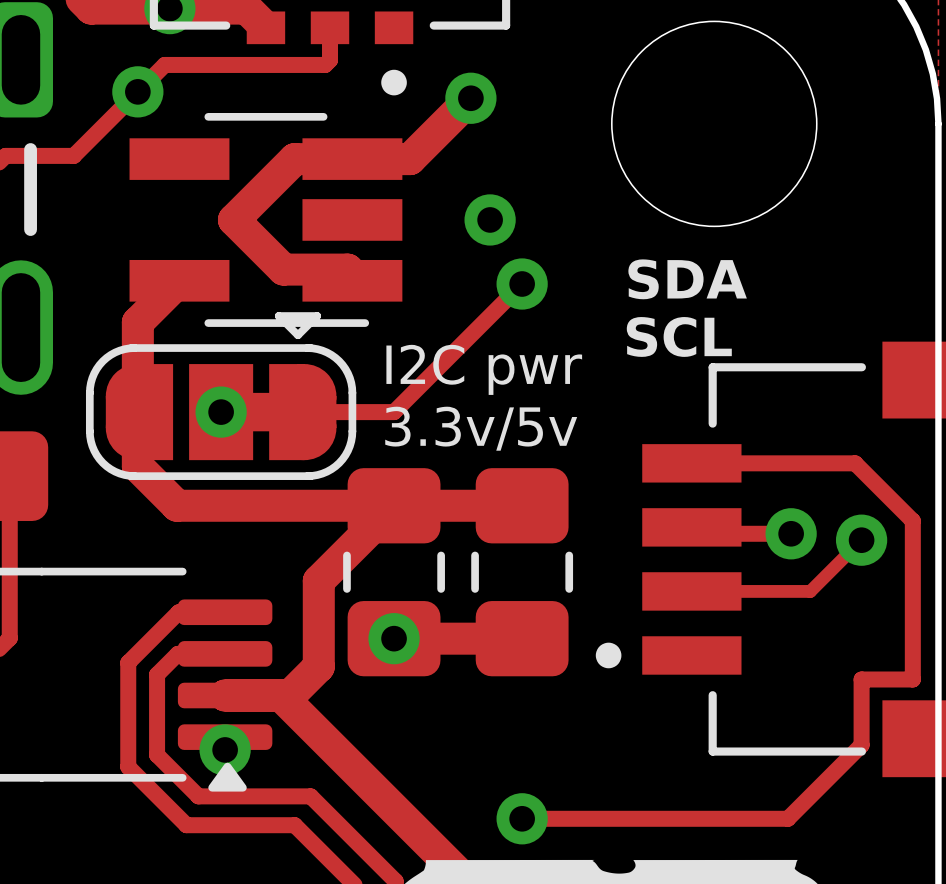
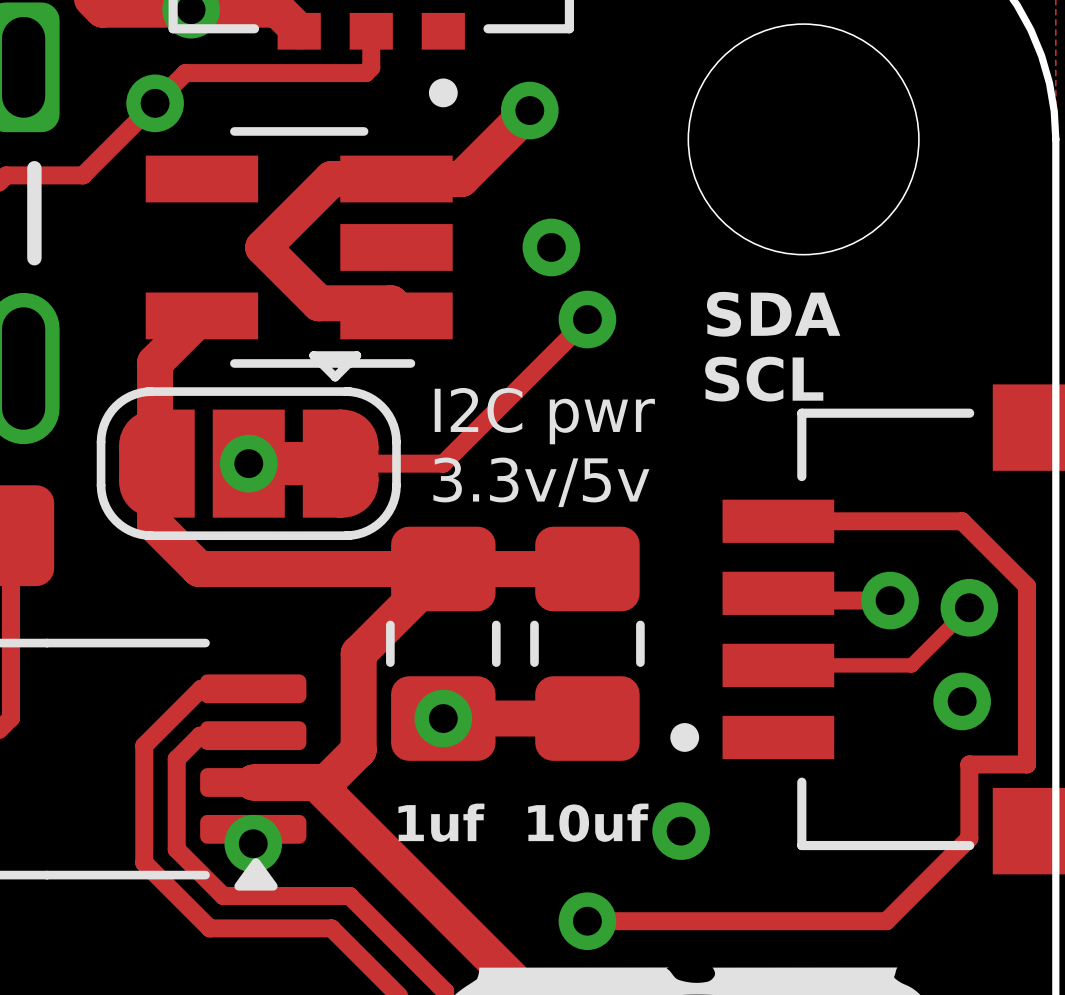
via: none -> (962, 701)
text: none -> 1uf (441, 822)
text: none -> 10uf (588, 822)
via: none -> (681, 831)

